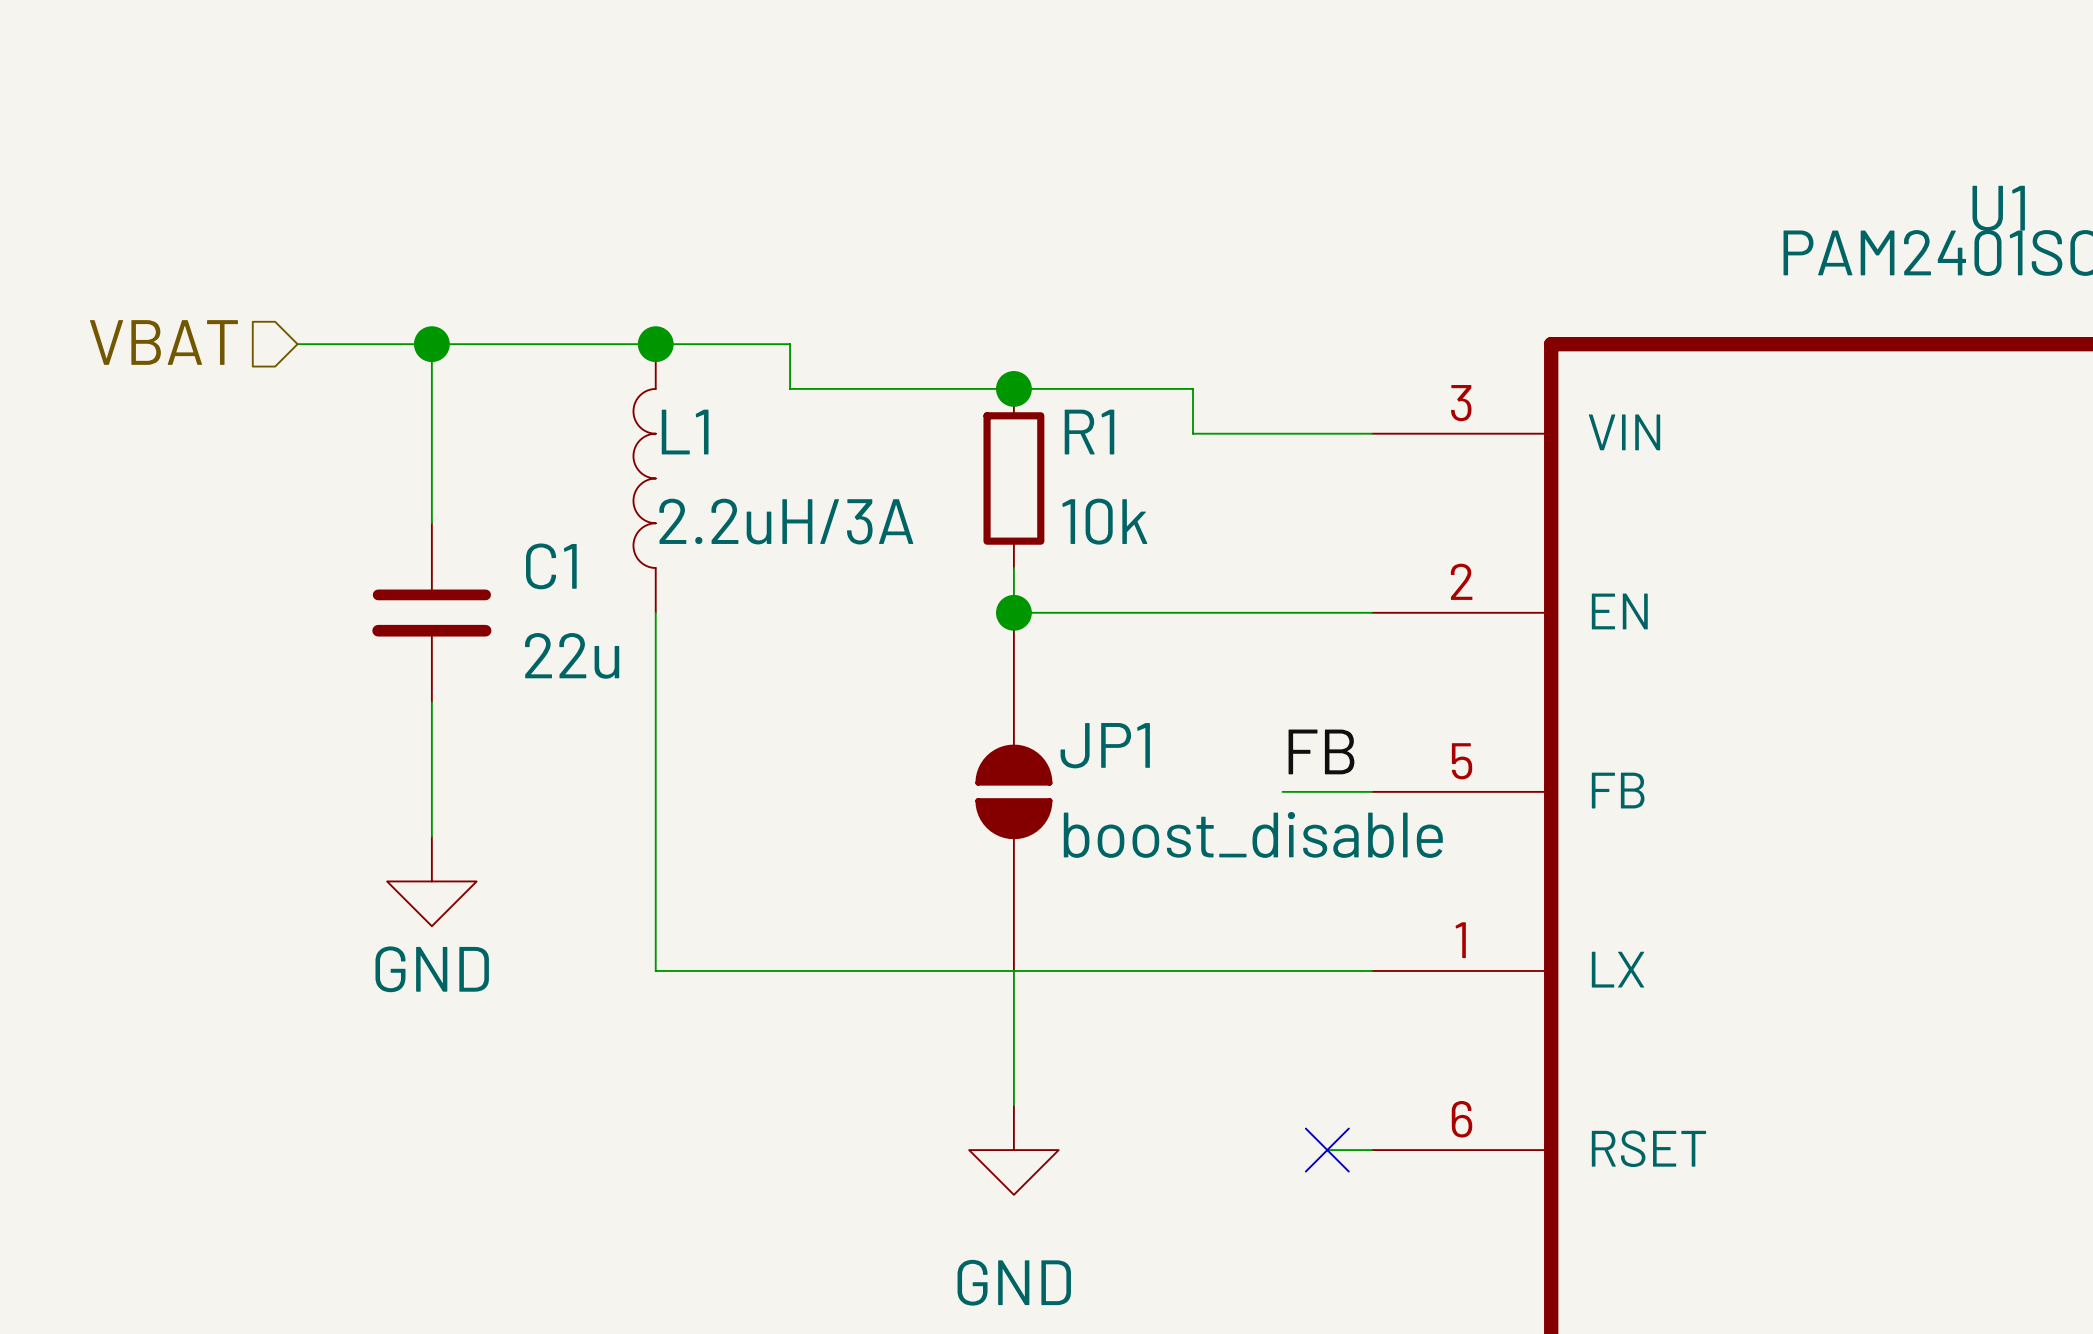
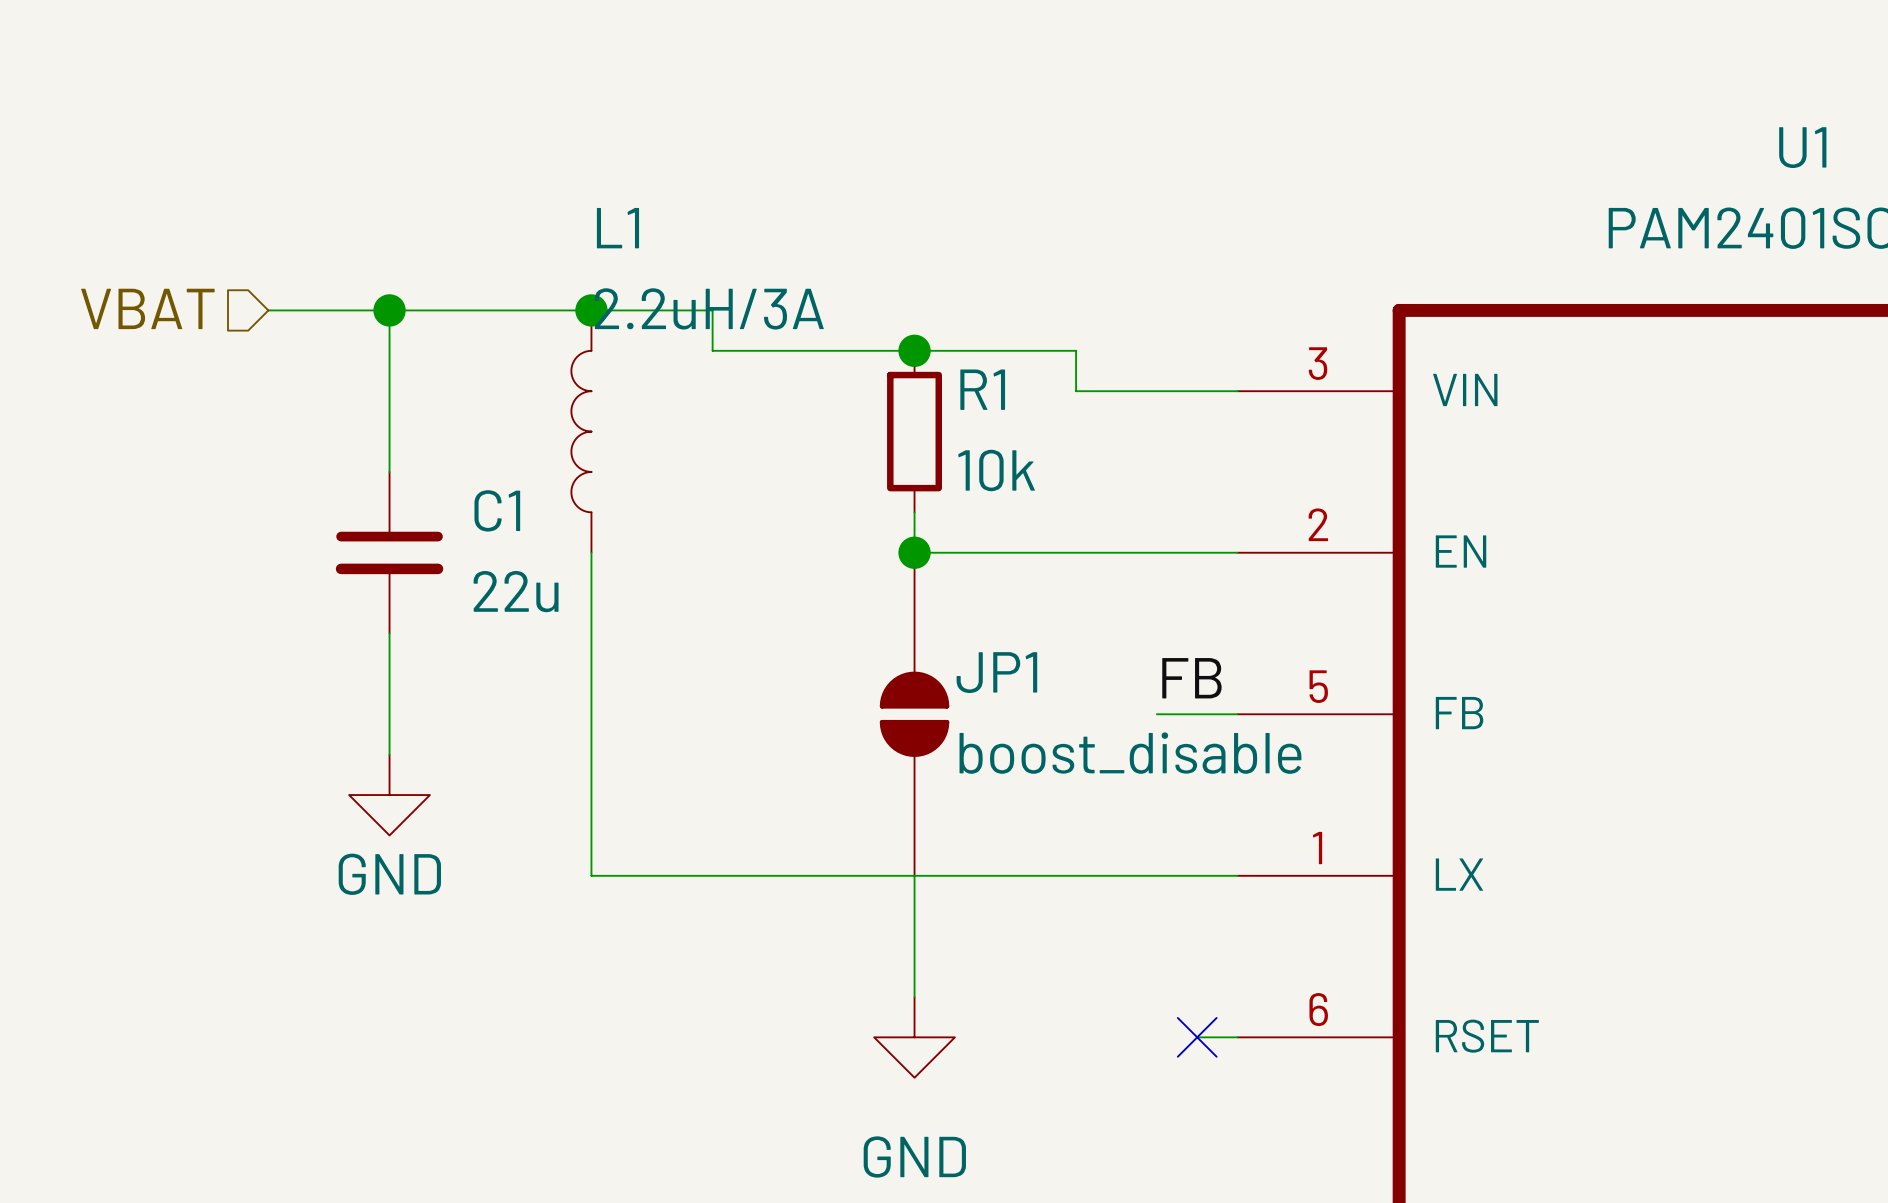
U1 name position: U1 (1998, 208) -> U1 (1802, 147)
L1 name position: L1 (685, 432) -> L1 (617, 228)
L1 value position: 2.2uH/3A (786, 521) -> 2.2uH/3A (709, 308)

